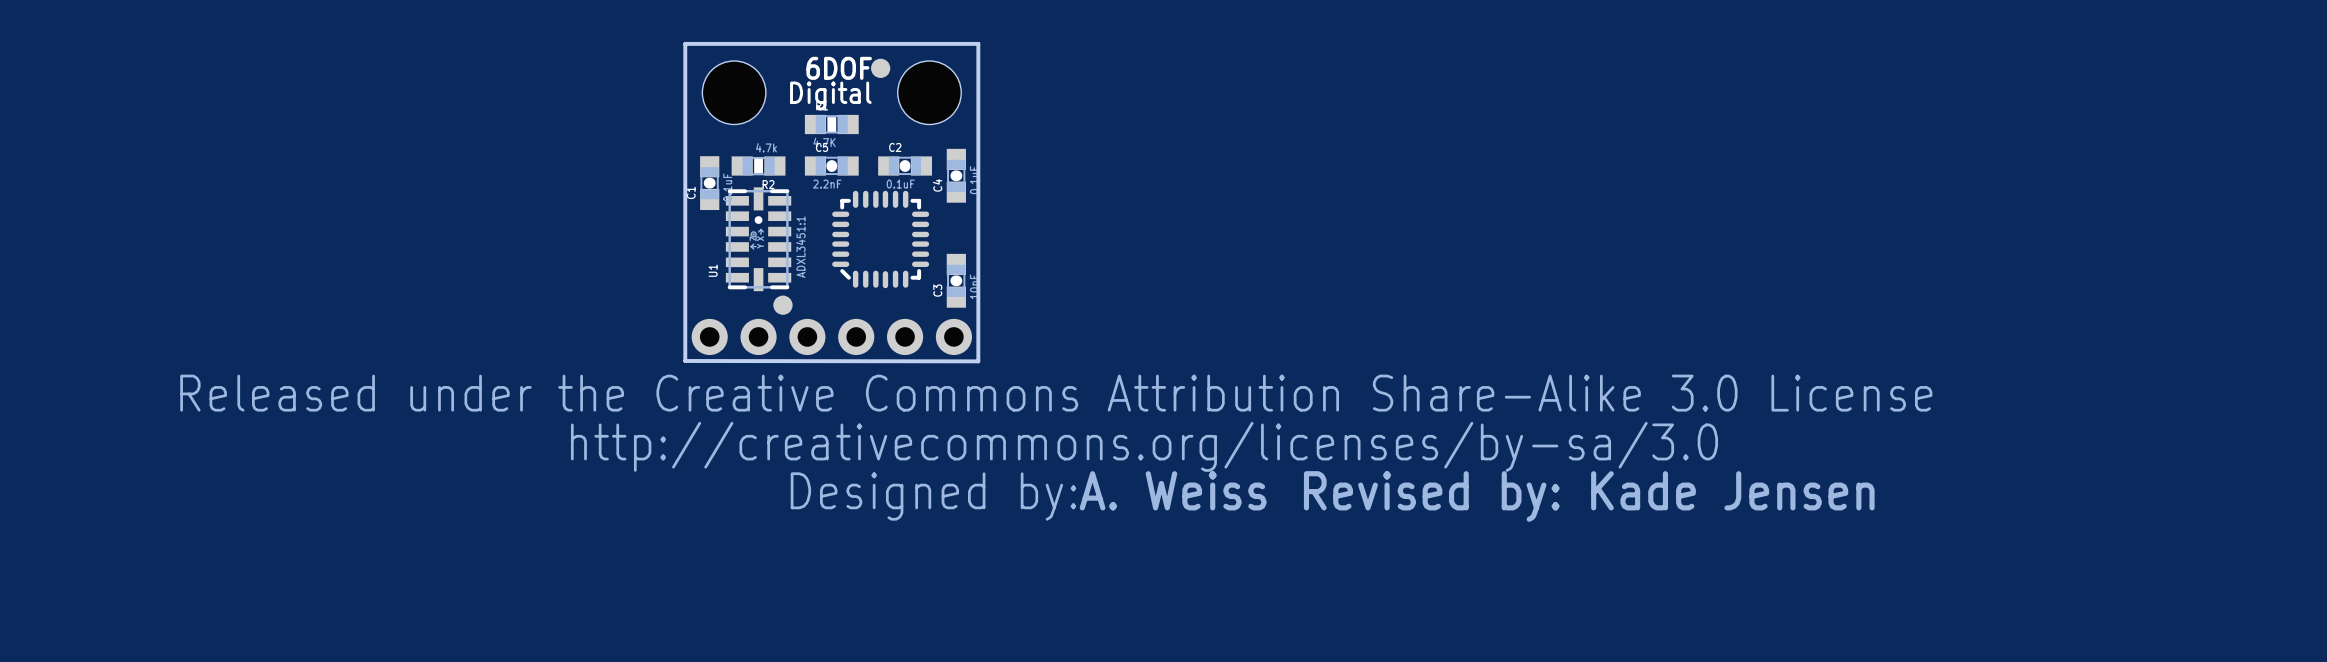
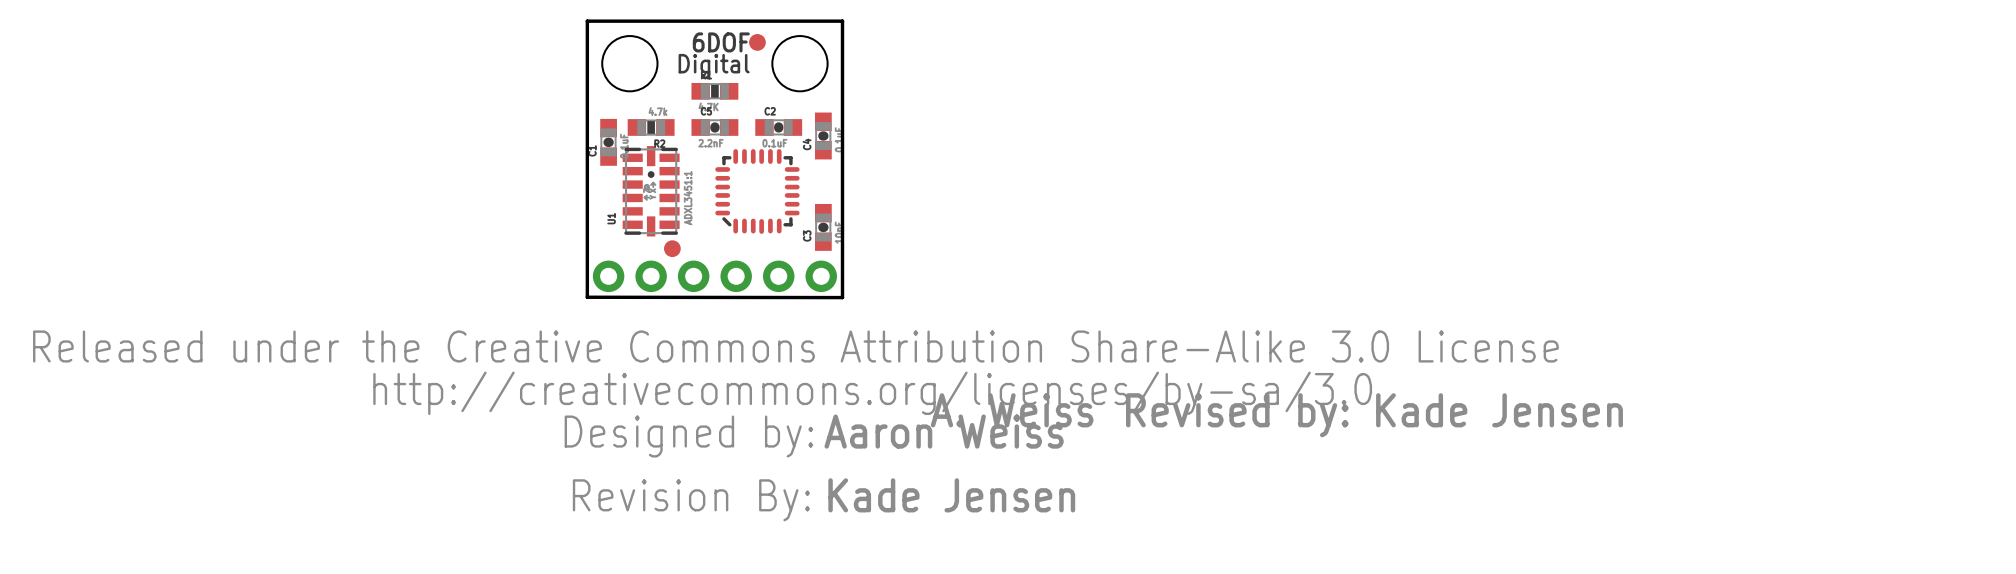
drawing position: (1056, 447) -> (795, 393)
text: none -> Aaron Weiss (944, 431)
drawing: none -> [572, 479, 810, 522]
text: none -> Kade Jensen (951, 495)

